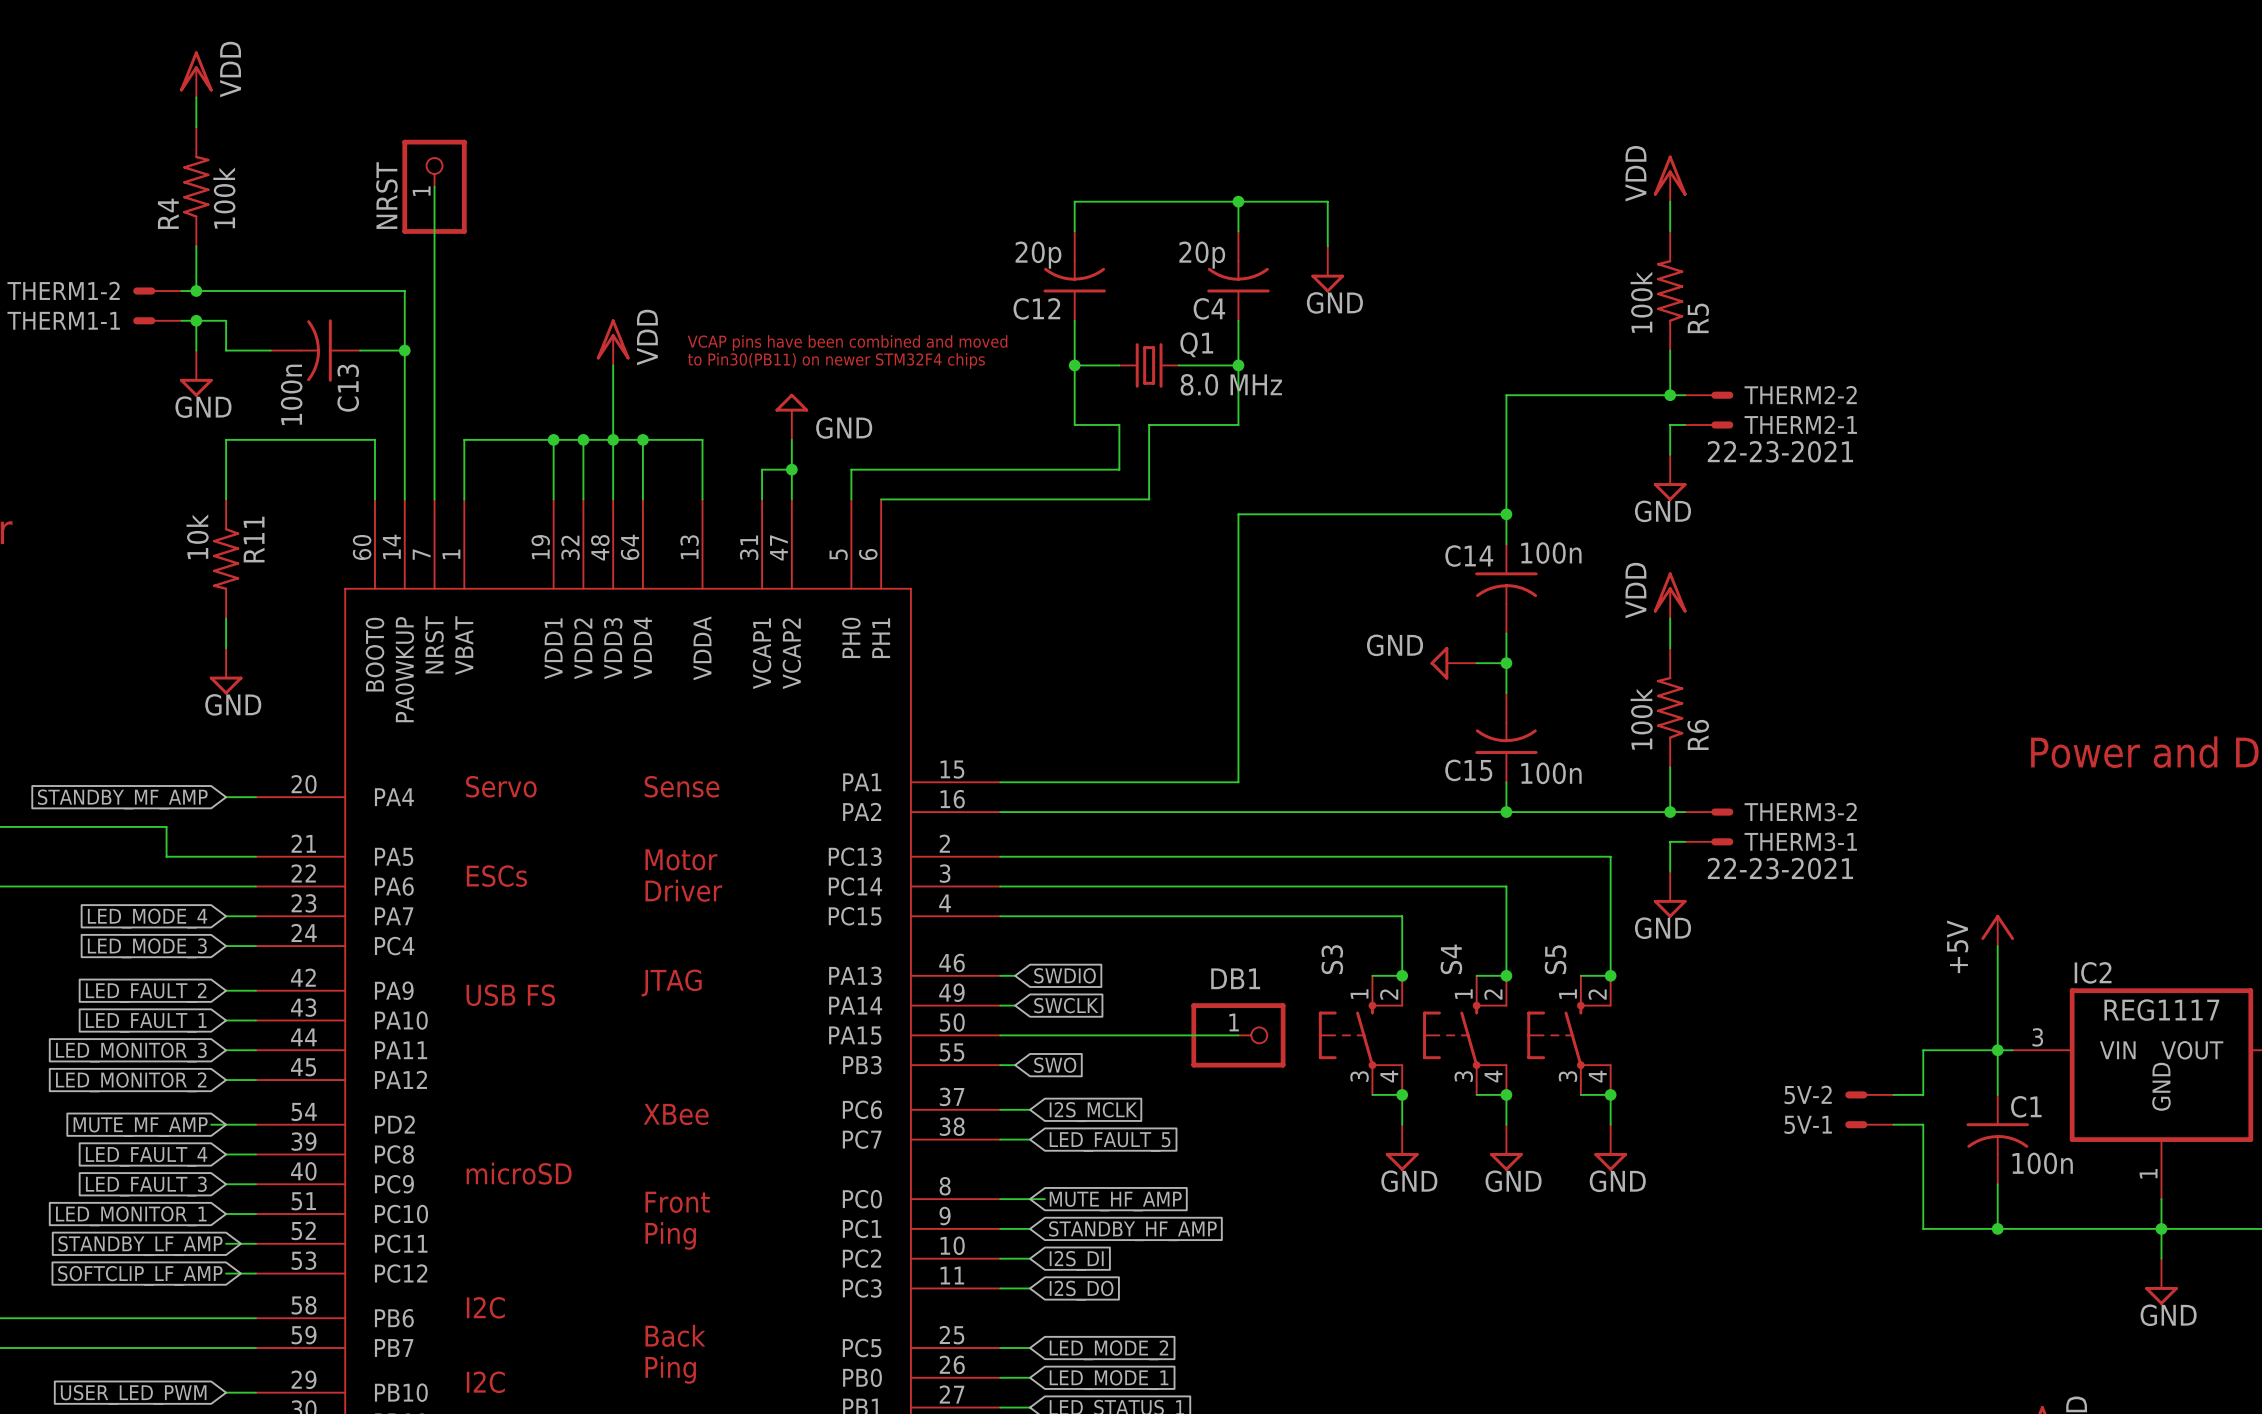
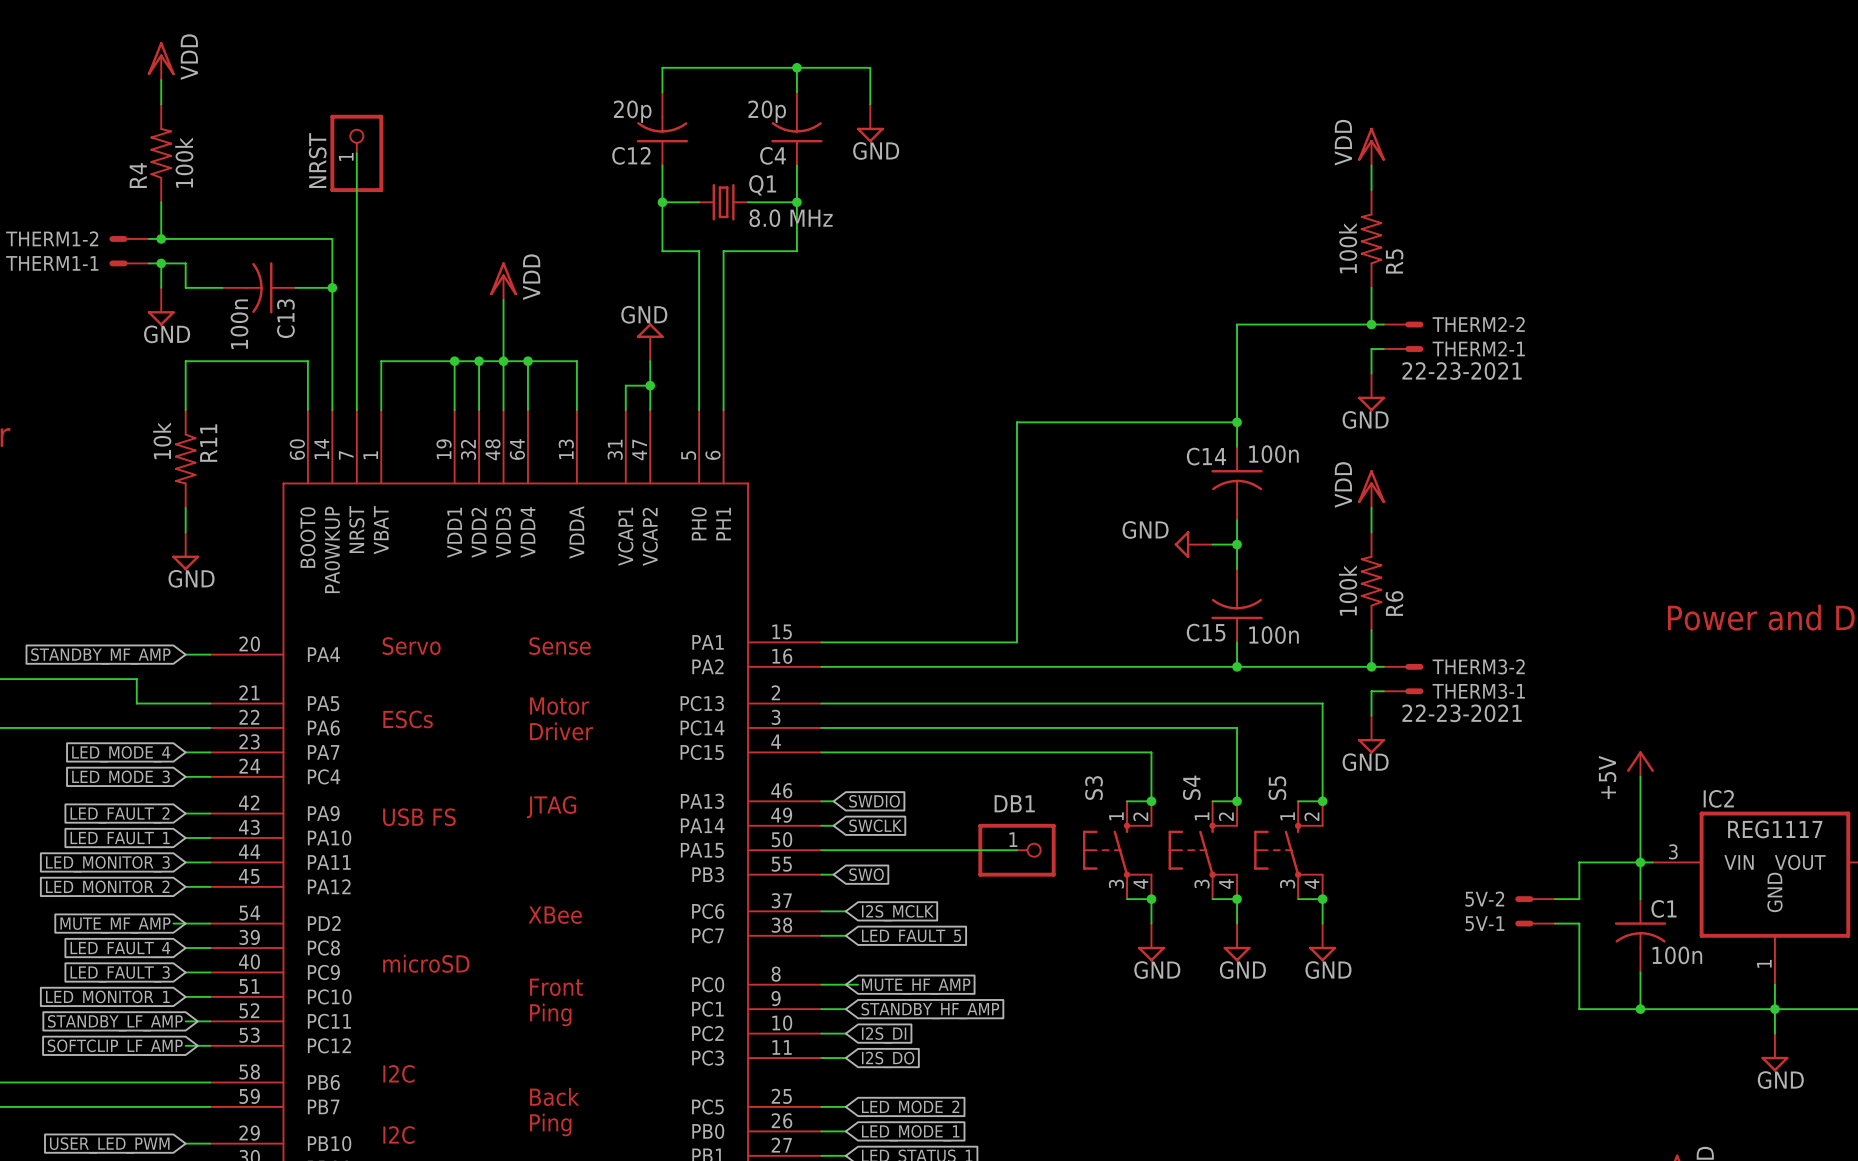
wire: none -> (796, 67) (796, 92)
junction: none -> (796, 67)
wire: none -> (662, 92) (662, 67) (870, 67) (870, 104)
power symbol: none -> GND (870, 123)
wire: (1238, 201) (1238, 231) -> none
junction: (1238, 201) -> none
wire: (1074, 231) (1074, 201) (1327, 201) (1327, 246) -> none
wire: none -> (662, 202) (699, 202)
junction: none -> (662, 202)
wire: none -> (748, 202) (796, 202)
junction: none -> (796, 202)
power symbol: GND (1327, 269) -> none
C12 position: (1074, 276) -> (662, 128)
C4 position: (1238, 276) -> (796, 128)
wire: (1074, 320) (1074, 424) (1119, 424) (1119, 469) (851, 469) -> (662, 165) (662, 251) (699, 251) (699, 385)
wire: (1238, 320) (1238, 424) (1149, 424) (1149, 499) (881, 499) -> (796, 165) (796, 251) (723, 251) (723, 410)
text: VCAP pins have been combined and moved (847, 343) -> none
text: to Pin30(PB11) on newer STM32F4 chips (836, 360) -> none
wire: (1074, 365) (1119, 365) -> none
junction: (1074, 365) -> none
Q1 position: (1149, 365) -> (723, 202)
wire: (1178, 365) (1238, 365) -> none
junction: (1238, 365) -> none
power symbol text position: GND (844, 427) -> GND (644, 314)

